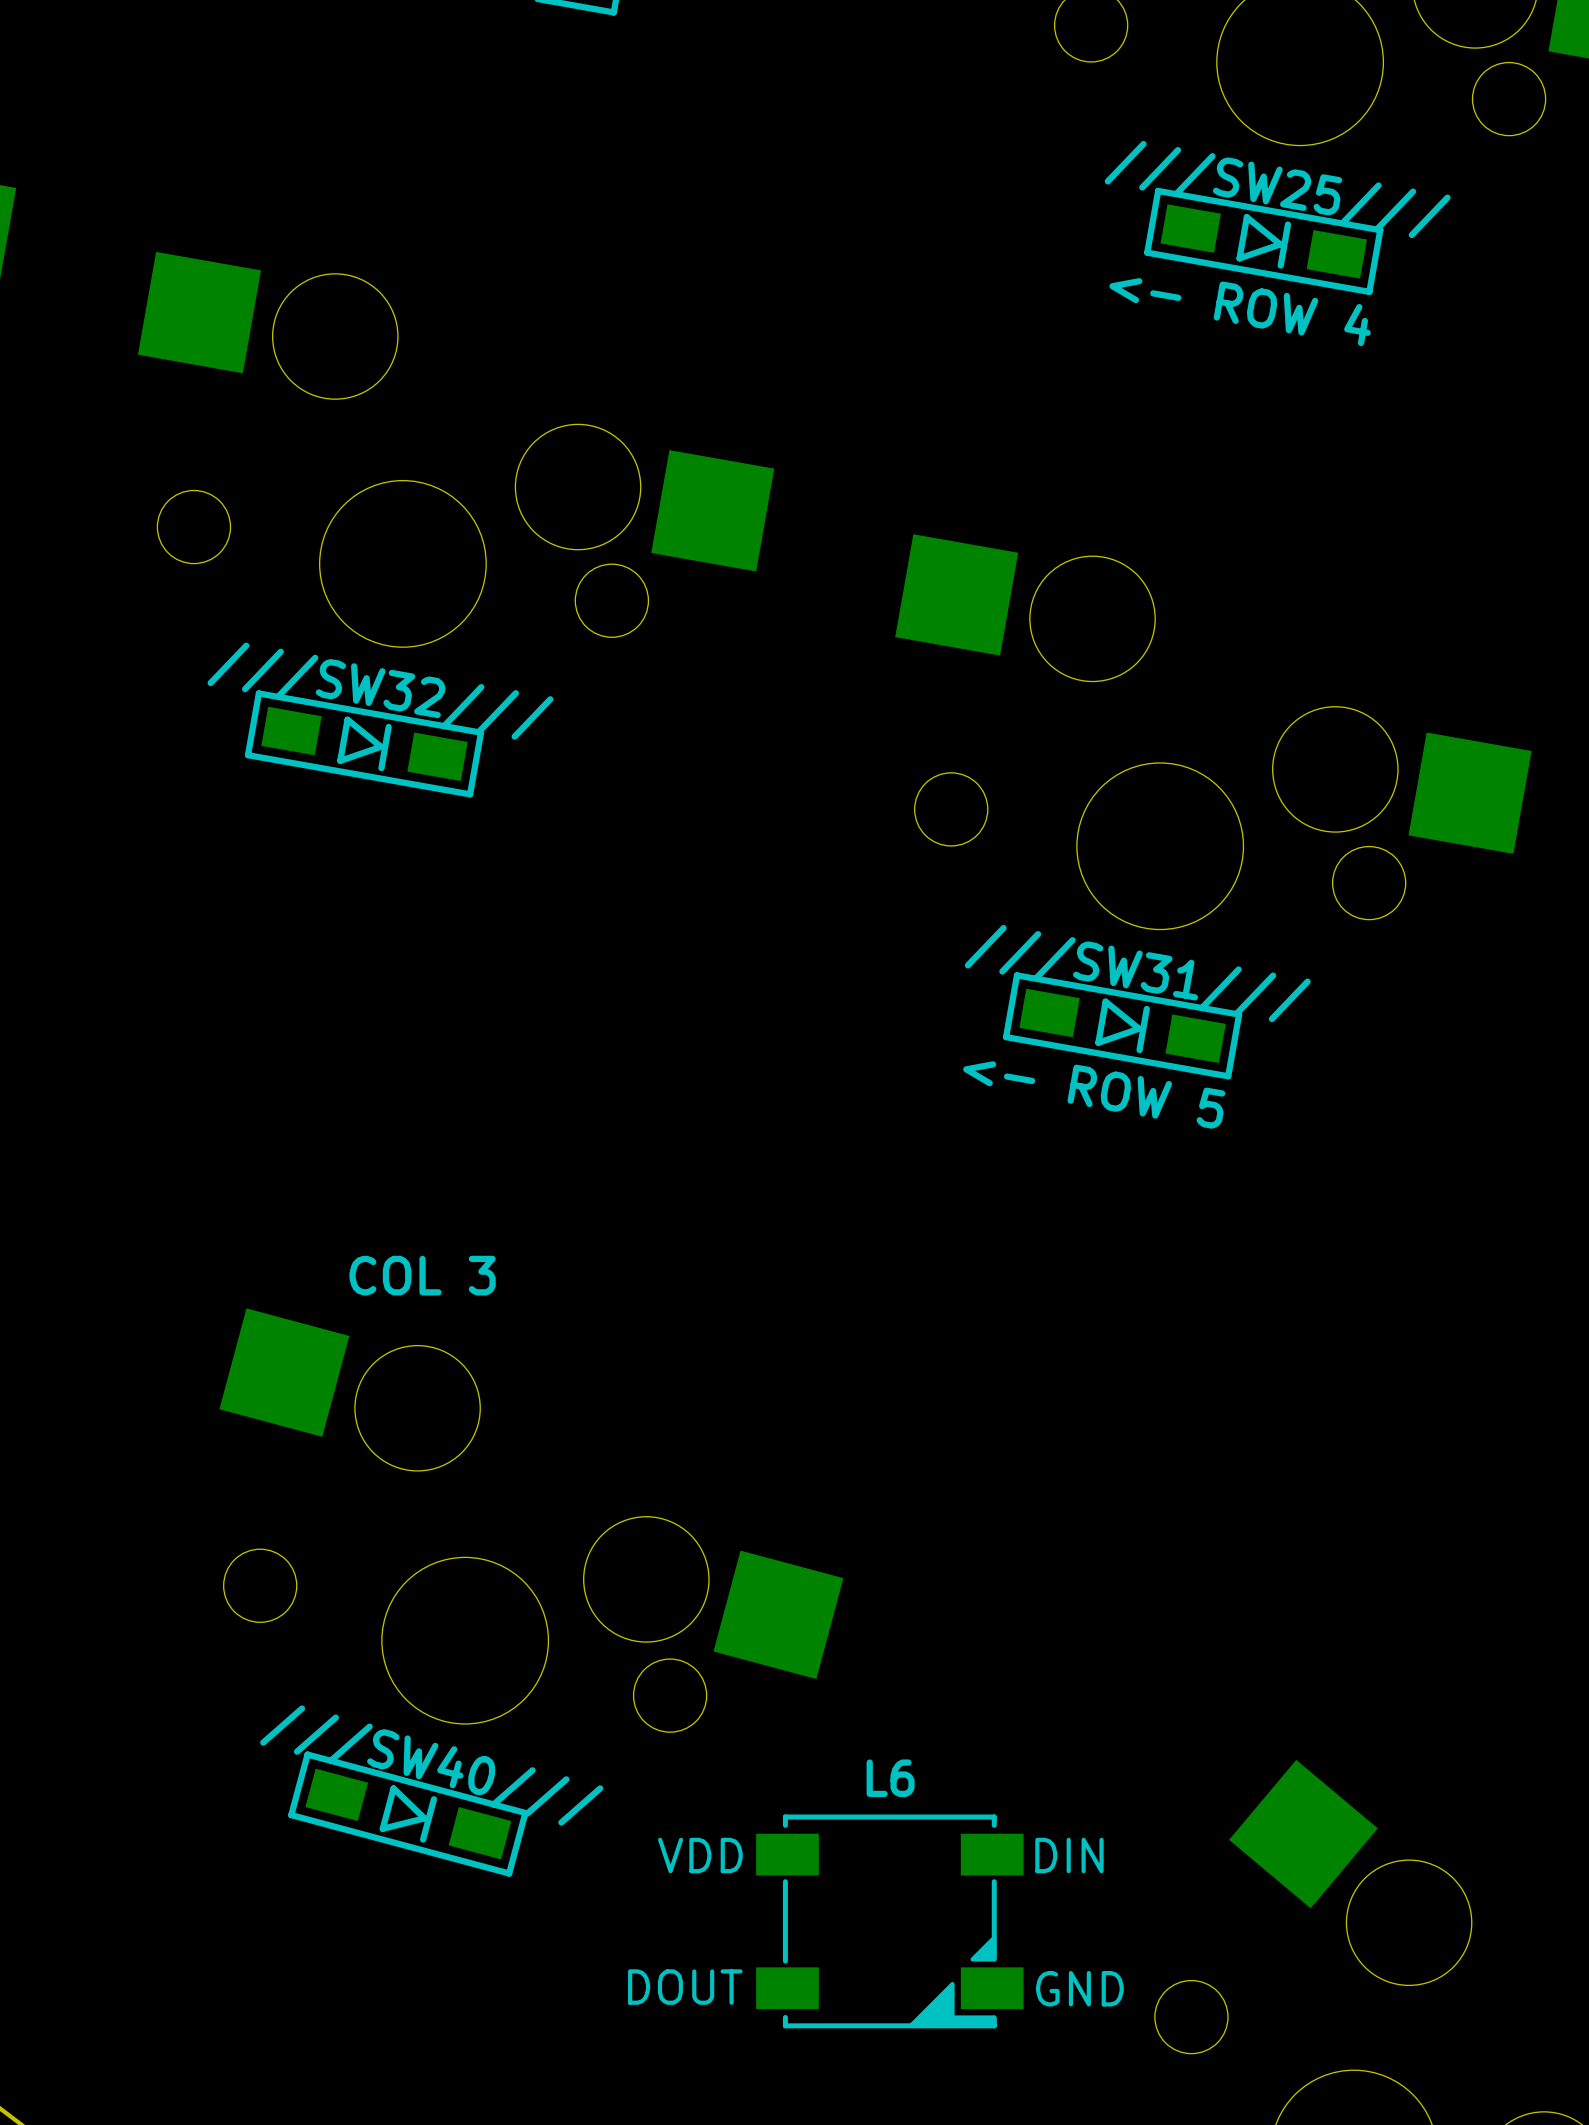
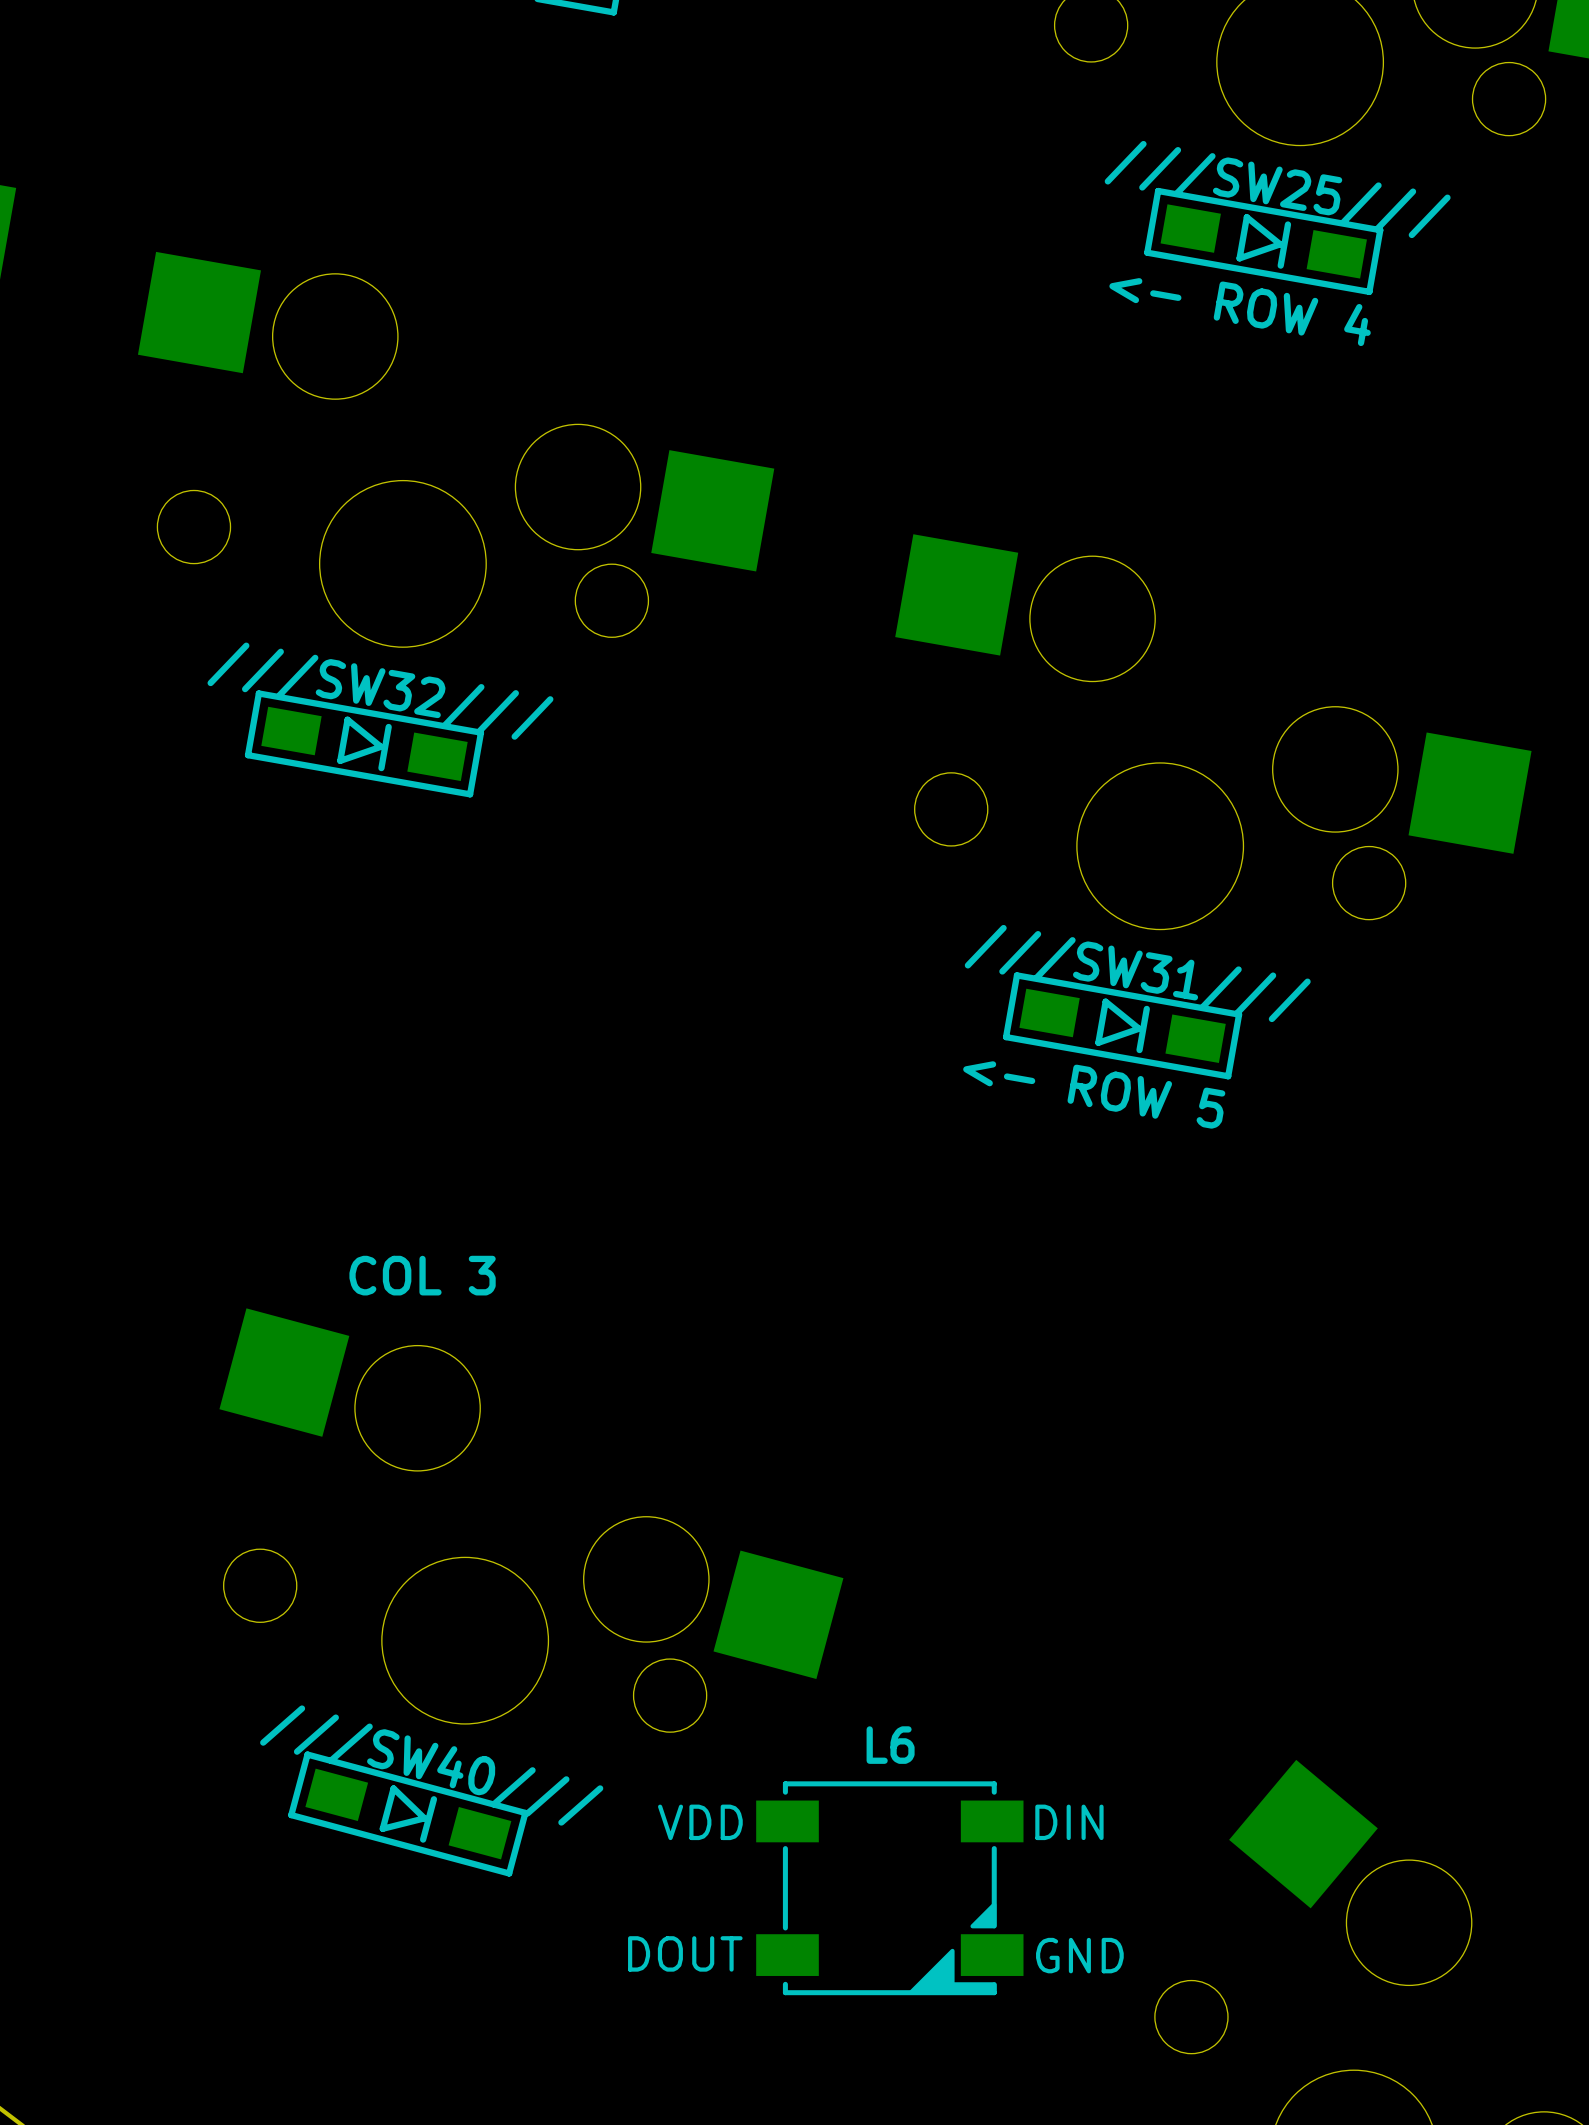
L6 position: (889, 1921) -> (889, 1888)

